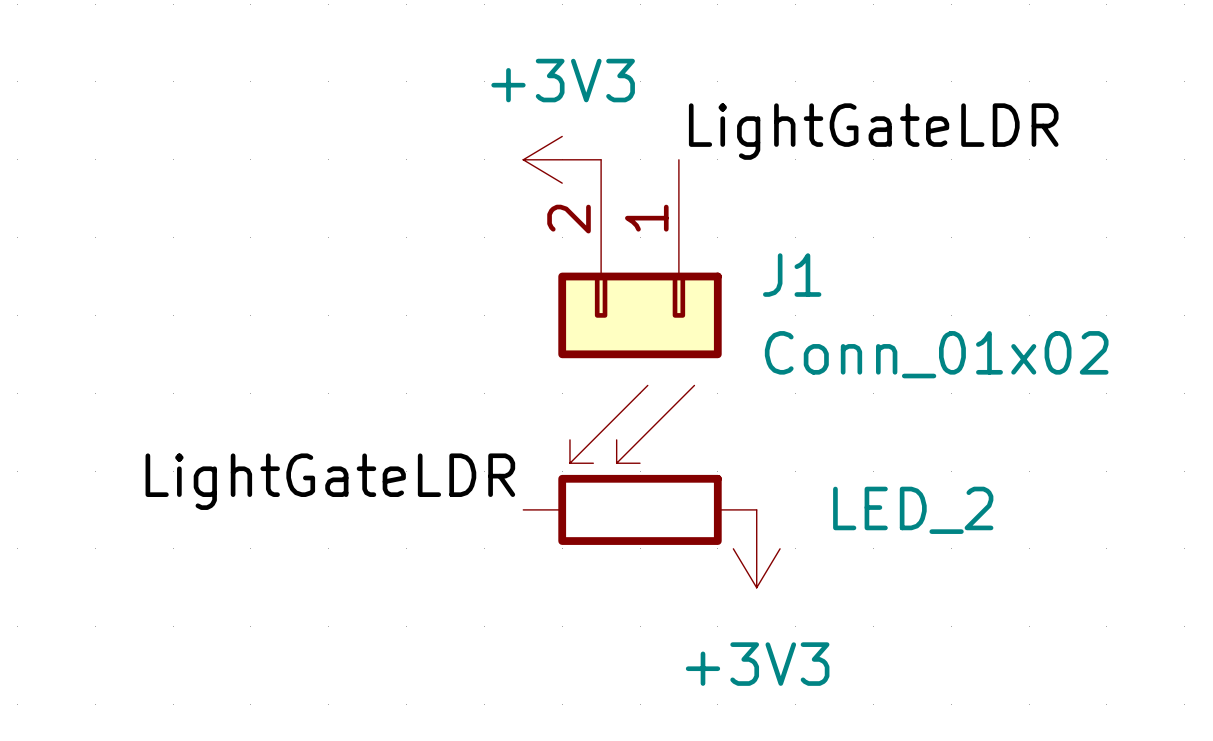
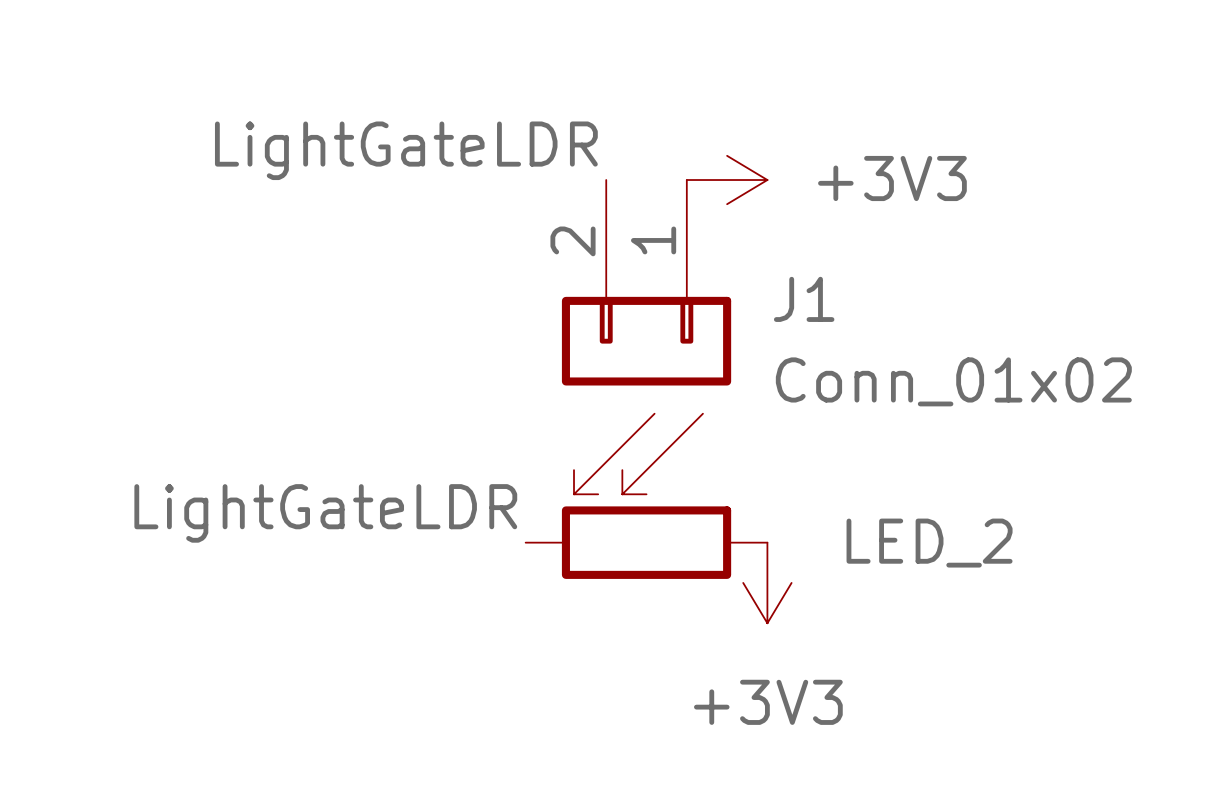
power symbol text position: +3V3 (563, 80) -> +3V3 (892, 178)
label position: LightGateLDR (873, 131) -> LightGateLDR (406, 150)
power symbol rotation: 0° (562, 159) -> 180° (727, 180)
power symbol position: +3V3 (562, 159) -> +3V3 (727, 180)

